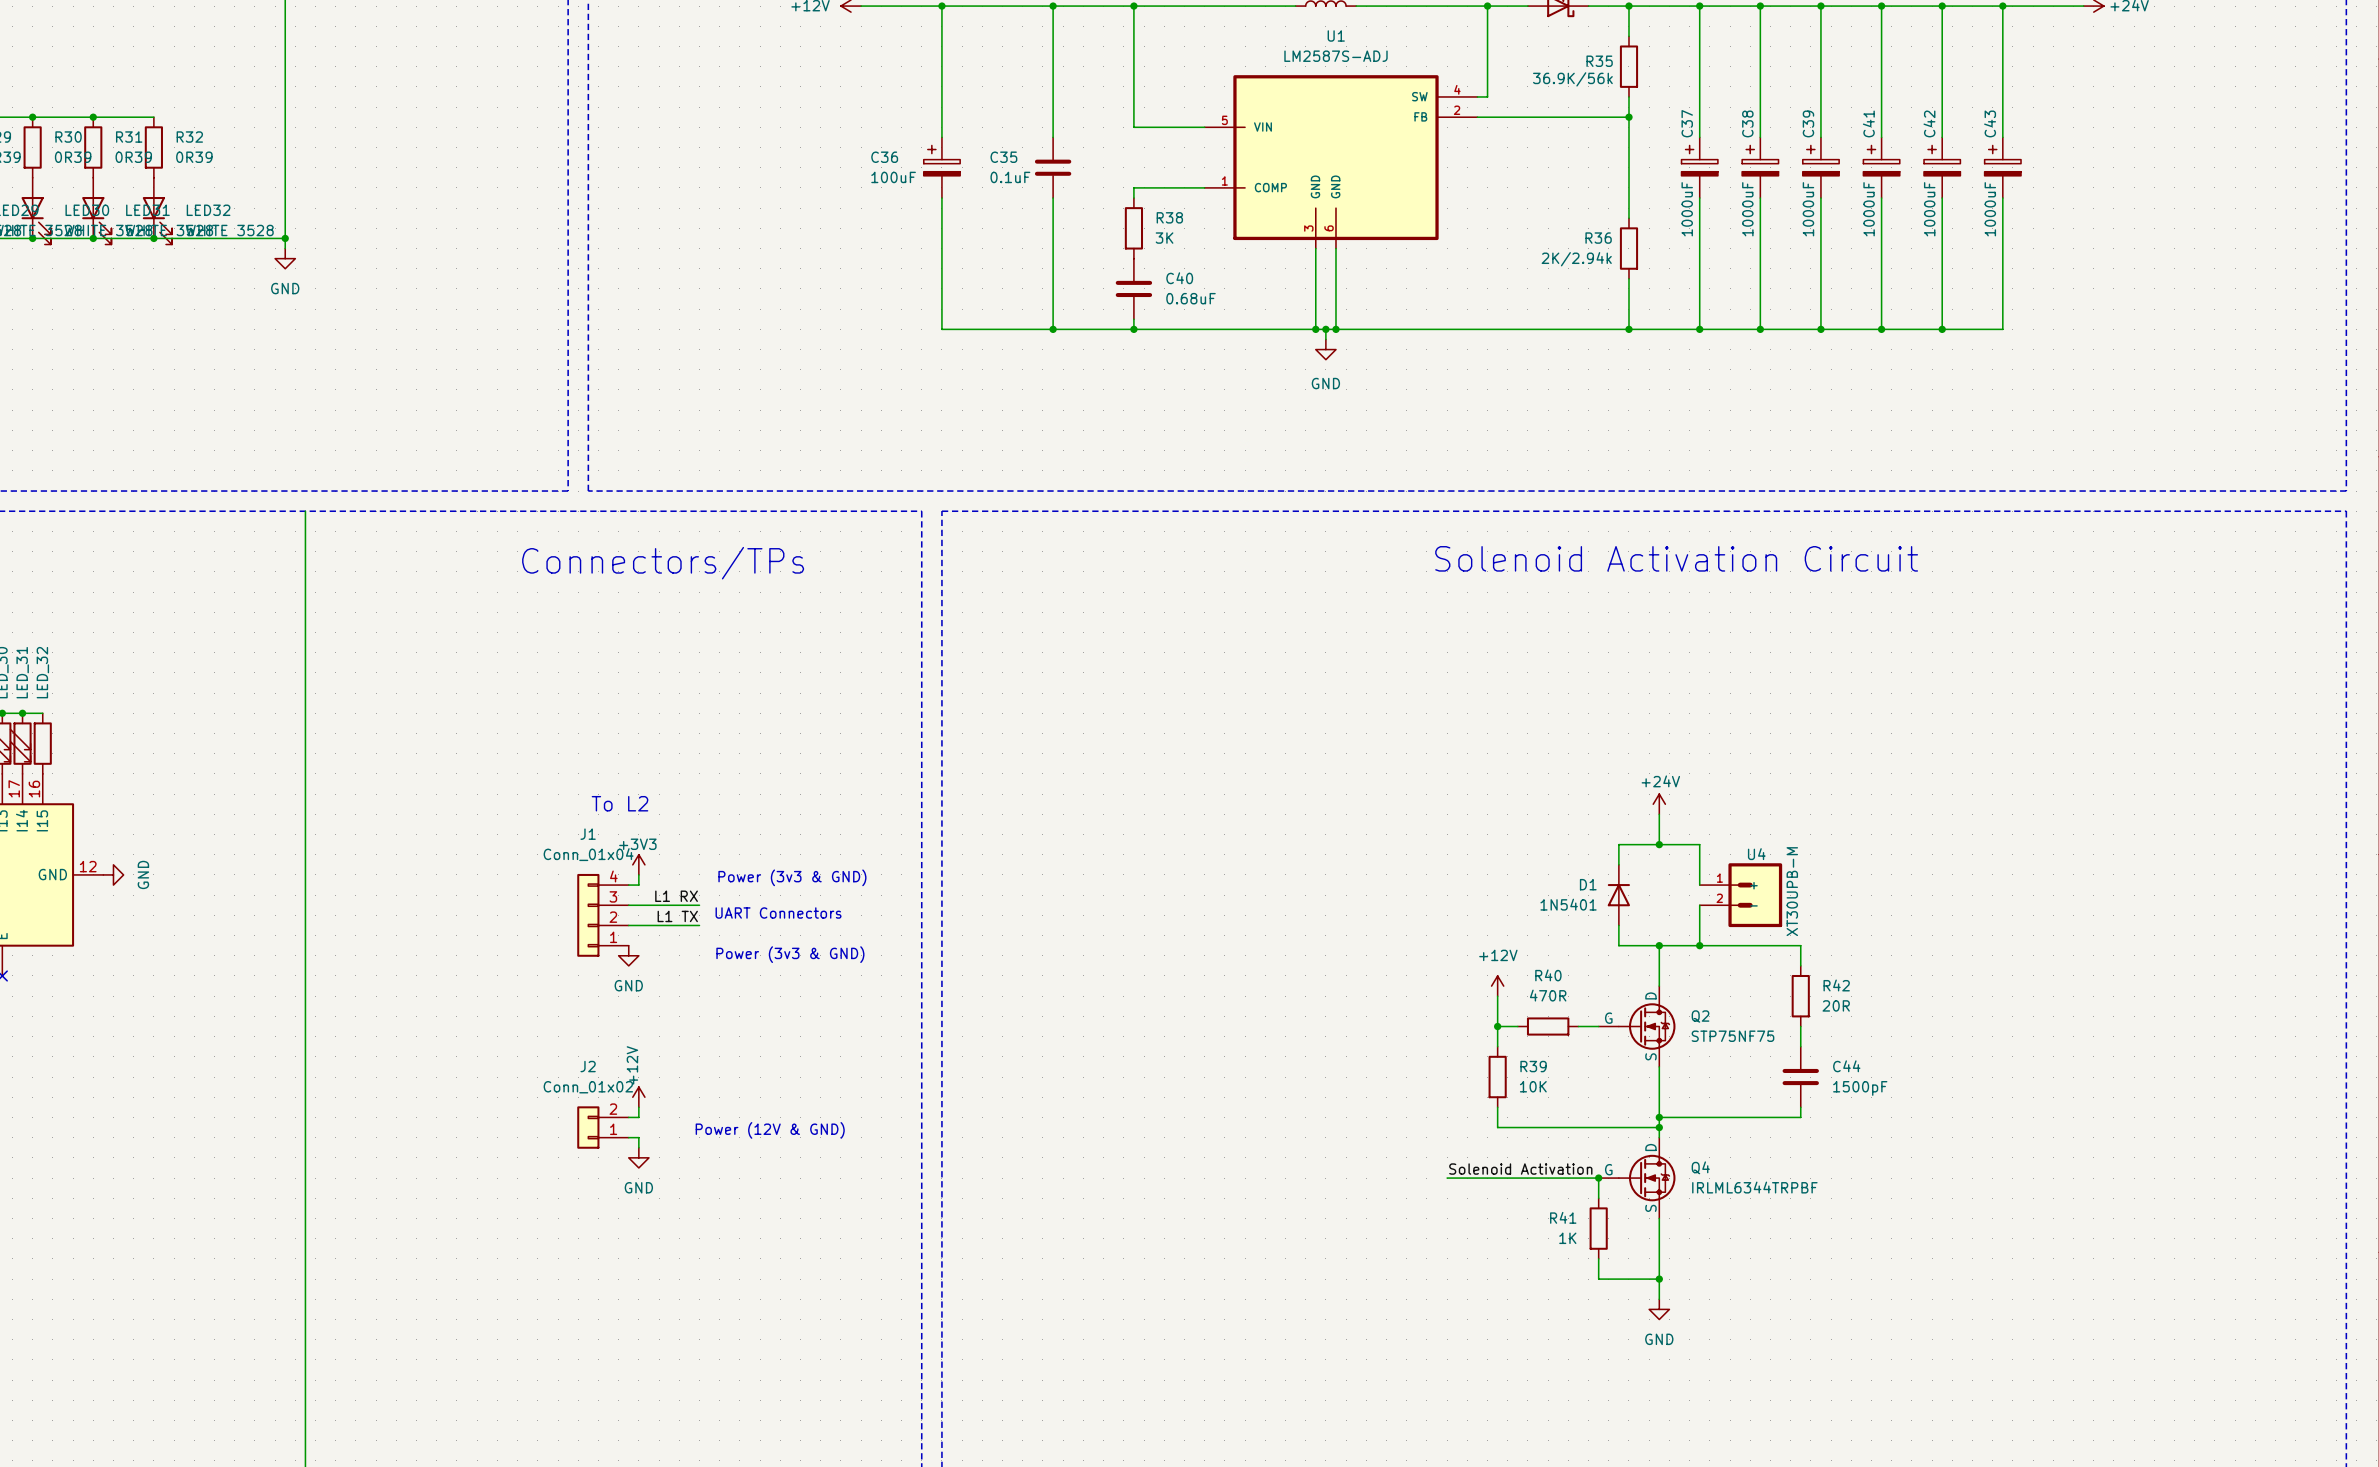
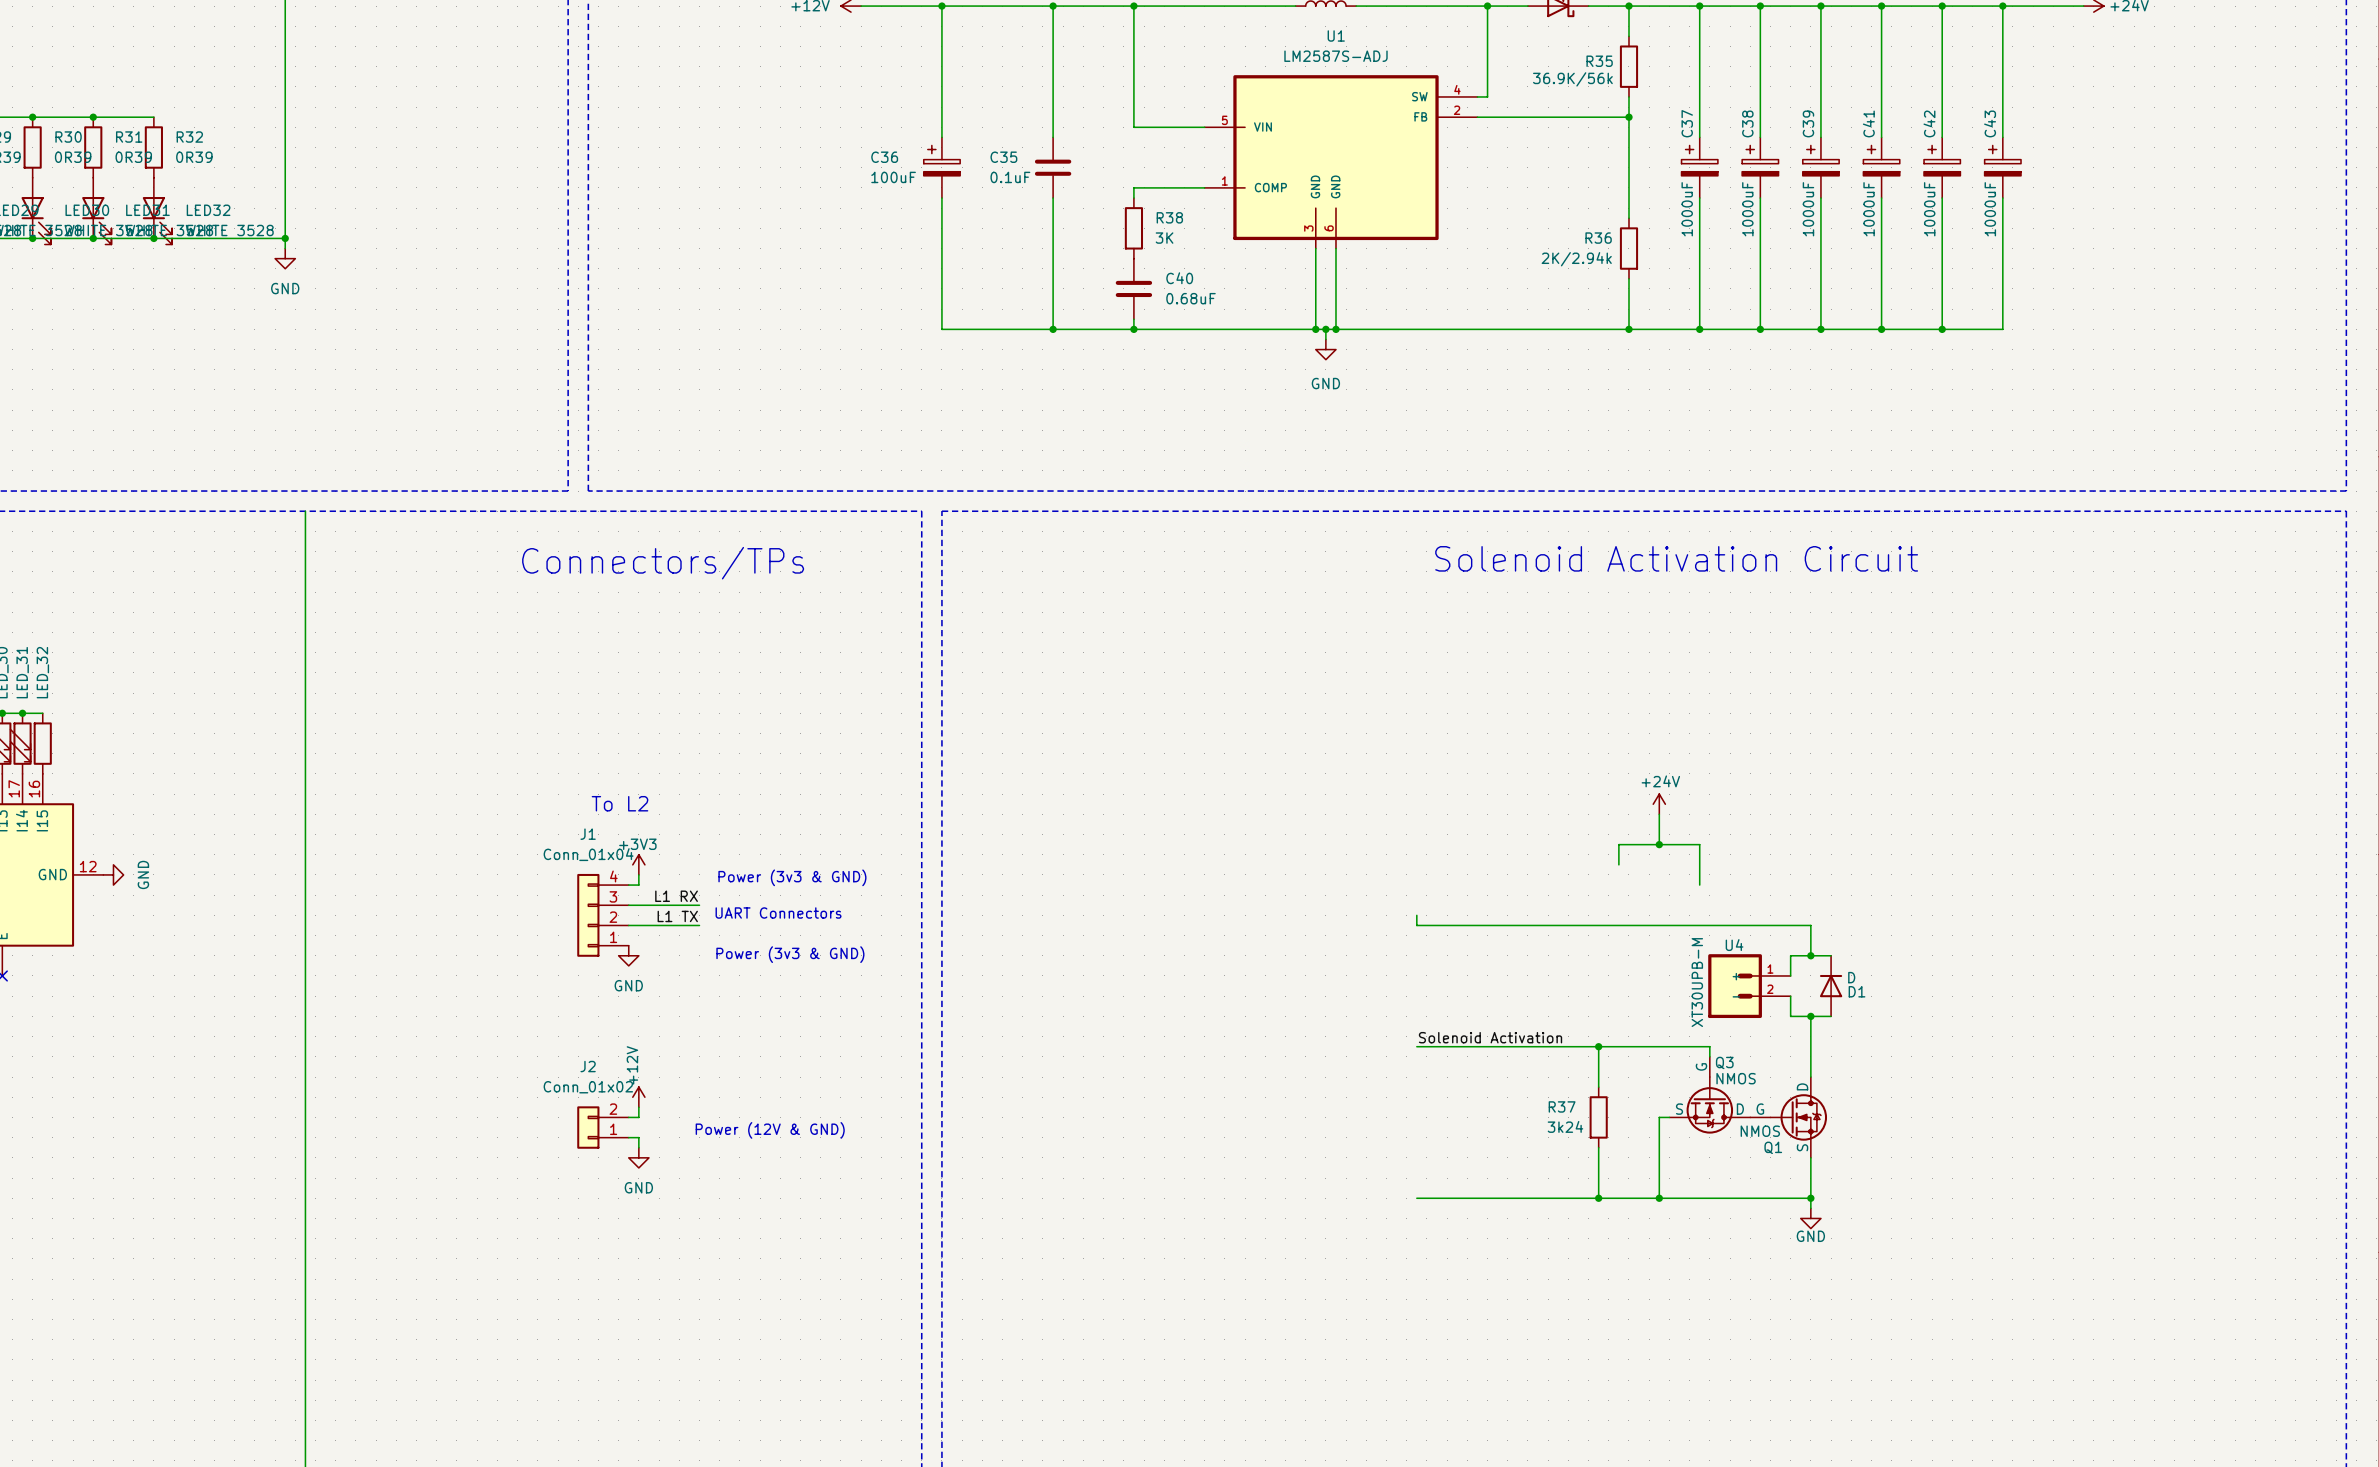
D1 name position: D1 (1588, 884) -> D1 (1857, 991)
D1 position: (1618, 895) -> (1831, 986)
U4 position: (1740, 895) -> (1749, 986)
U4 flip: as is (1755, 895) -> left-right (1735, 986)
D1 value: 1N5401 (1568, 904) -> D (1851, 977)
wire: (1699, 905) (1699, 945) -> none
wire: none -> (1416, 915) (1416, 925) (1810, 925) (1810, 955)
wire: (1618, 925) (1618, 945) (1800, 945) (1800, 965) -> none
wire: (1659, 945) (1659, 986) -> (1598, 1046) (1598, 1087)
junction: (1659, 945) -> none
junction: (1699, 945) -> none
junction: none -> (1810, 955)
wire: none -> (1831, 955) (1790, 955) (1790, 975)
power symbol: +12V (1497, 986) -> none
wire: (1497, 996) (1497, 1046) -> none
wire: none -> (1790, 996) (1790, 1016) (1831, 1016)
R42: 20R (1800, 996) -> none
wire: none -> (1810, 1016) (1810, 1077)
junction: none -> (1810, 1016)
wire: (1497, 1026) (1517, 1026) -> none
junction: (1497, 1026) -> none
R40: 470R (1548, 1026) -> none
wire: (1578, 1026) (1598, 1026) -> none
Q2: STP75NF75 (1637, 1026) -> none
wire: (1800, 1026) (1800, 1046) -> none
wire: none -> (1416, 1046) (1709, 1046) (1709, 1056)
junction: none -> (1598, 1046)
wire: (1659, 1066) (1659, 1117) -> (1810, 1157) (1810, 1208)
R39: 10K (1497, 1077) -> none
C44: 1500pF (1800, 1077) -> none
Q3: none -> NMOS (1709, 1095)
wire: (1497, 1107) (1497, 1127) (1659, 1127) -> none
R37: none -> 3k24 (1598, 1117)
junction: (1659, 1117) -> none
Q1: none -> NMOS (1788, 1117)
junction: (1659, 1127) -> none
label position: Solenoid Activation (1520, 1169) -> Solenoid Activation (1490, 1037)
wire: (1447, 1178) (1598, 1178) -> (1598, 1147) (1598, 1178)
junction position: (1598, 1178) -> (1598, 1198)
Q4: IRLML6344TRPBF (1637, 1178) -> none
wire: none -> (1416, 1198) (1810, 1198)
junction: none -> (1659, 1198)
junction: none -> (1810, 1198)
wire: (1659, 1218) (1659, 1299) -> none
R41: 1K (1598, 1228) -> none
wire: (1598, 1258) (1598, 1279) (1659, 1279) -> none
junction: (1659, 1279) -> none
power symbol position: GND (1659, 1309) -> GND (1810, 1218)
power symbol text position: GND (1659, 1339) -> GND (1810, 1236)

